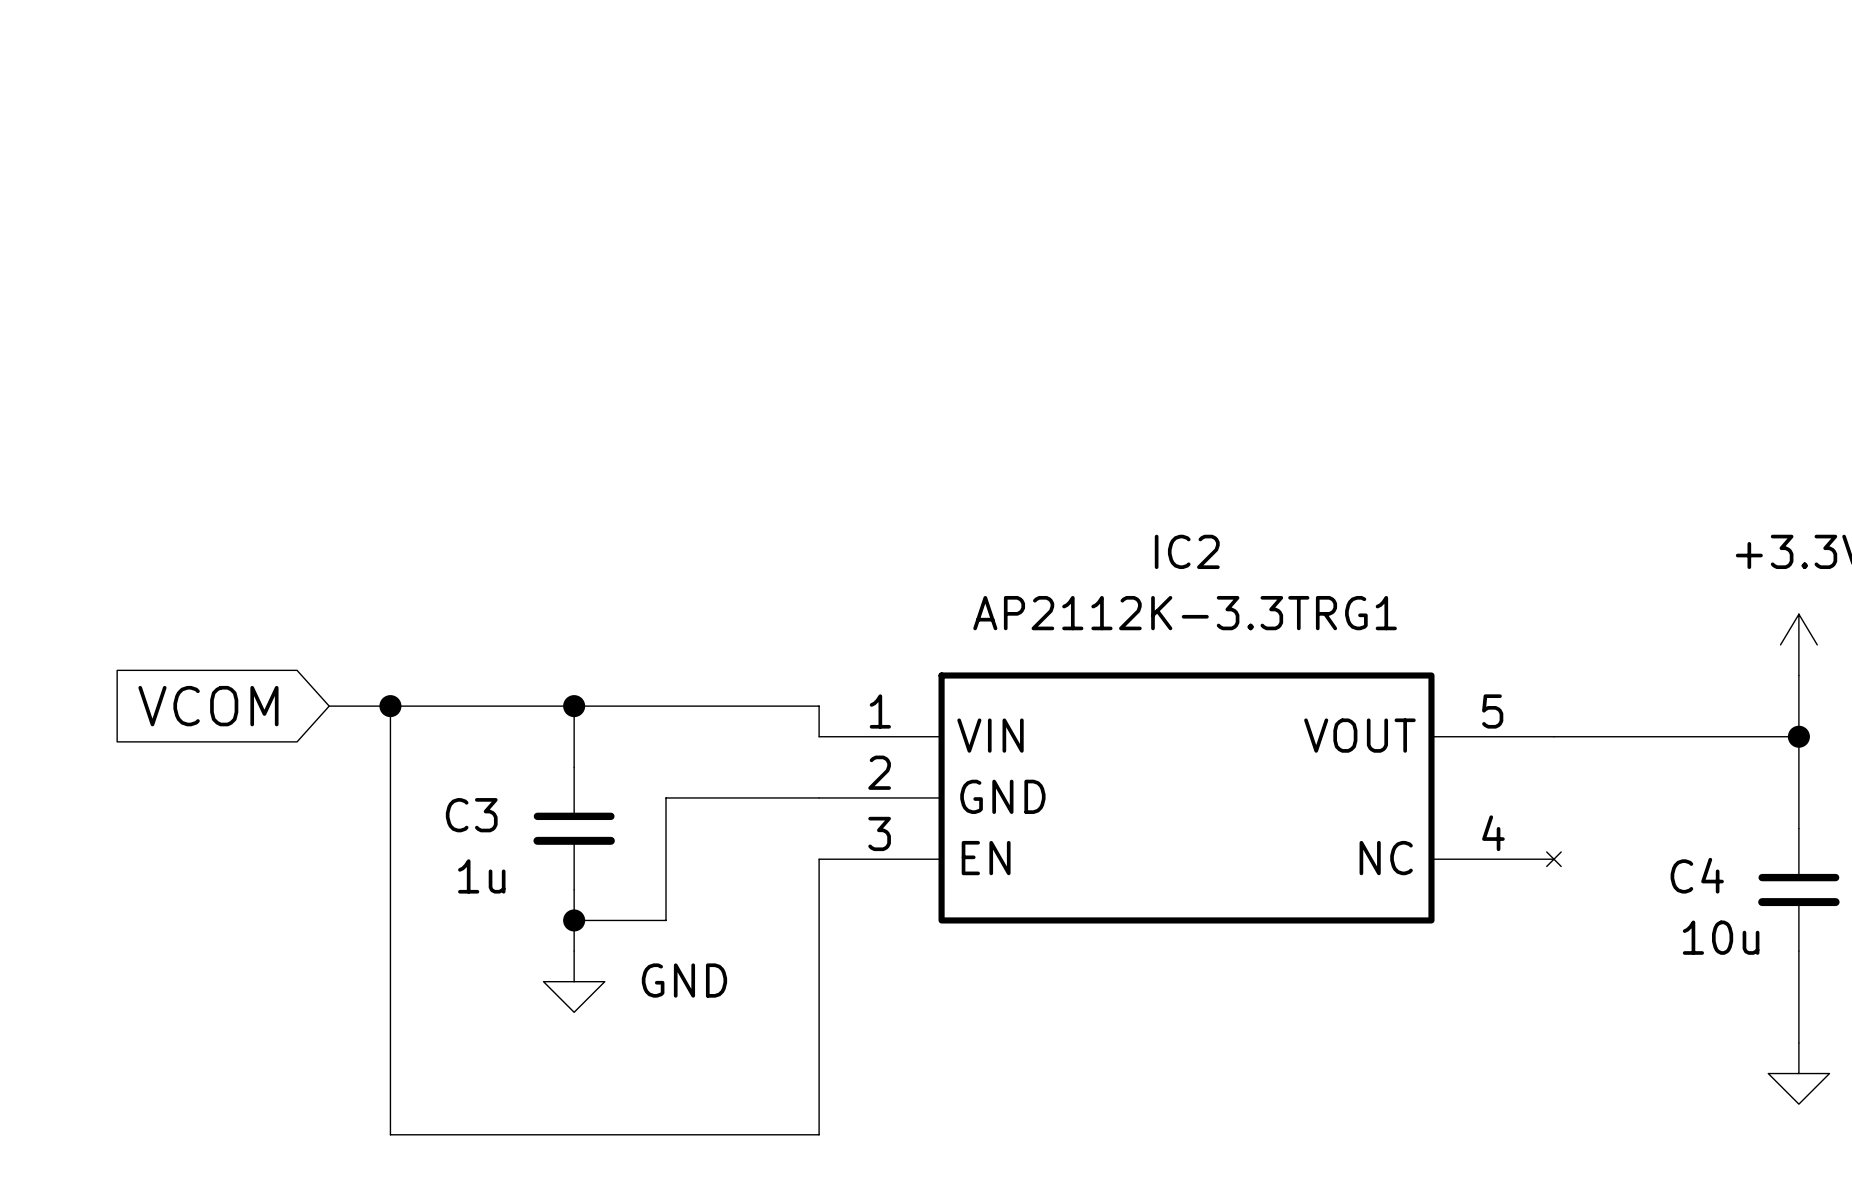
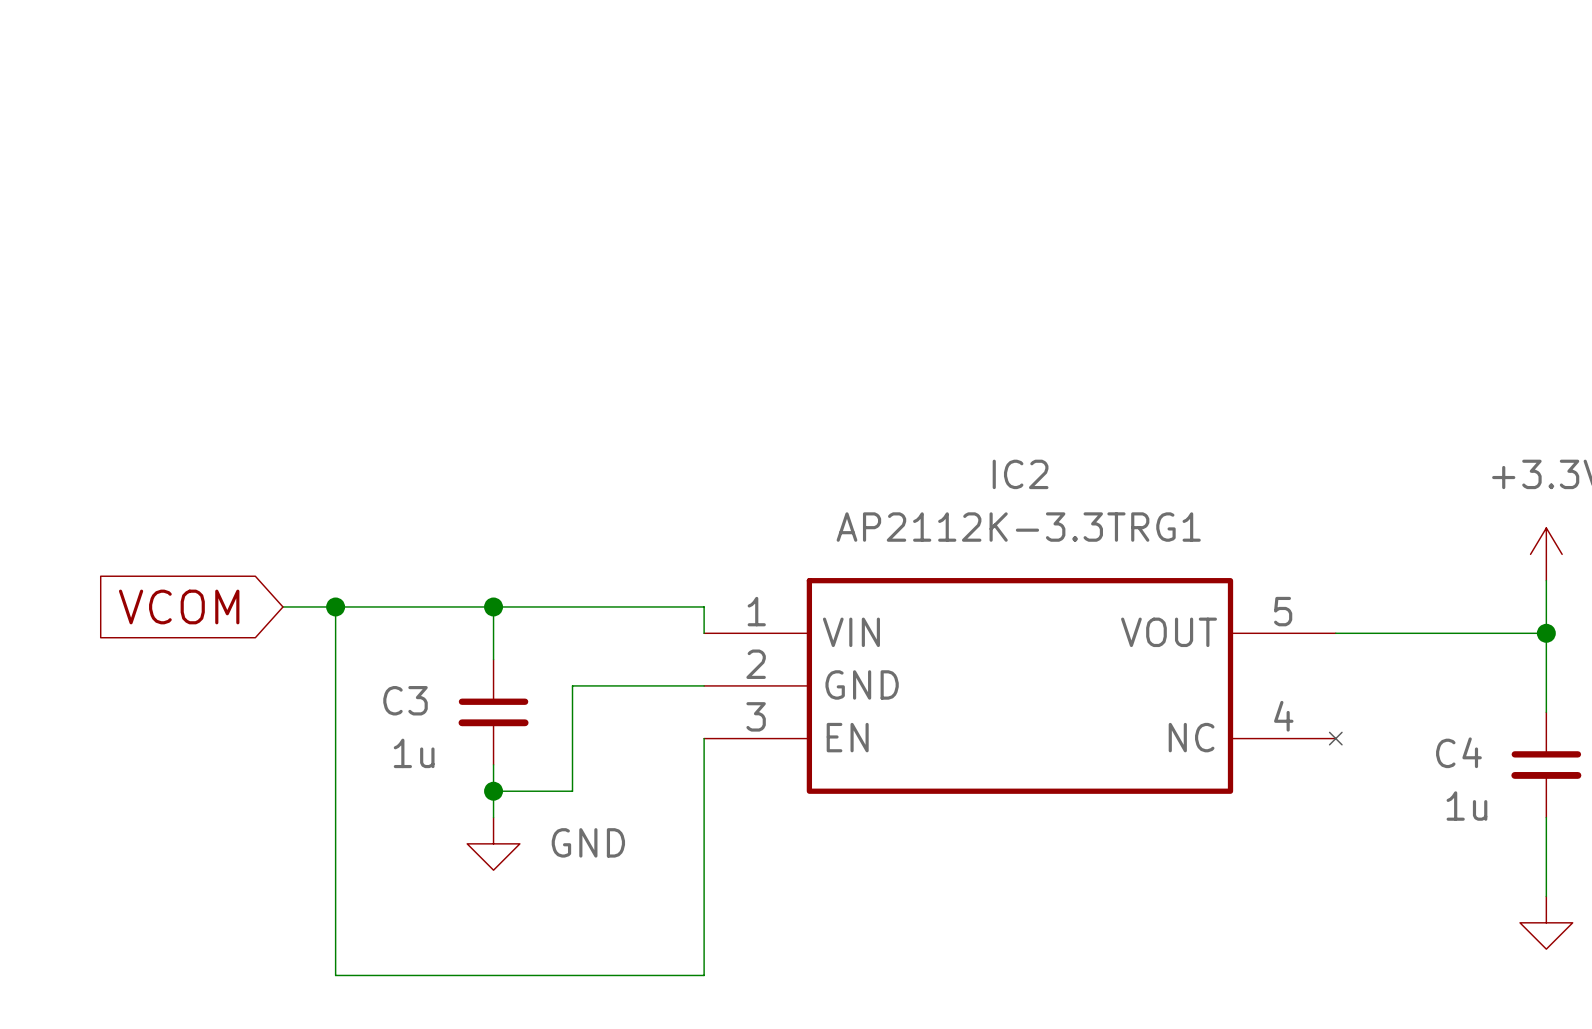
C4 value: 10u (1721, 937) -> 1u (1466, 806)

